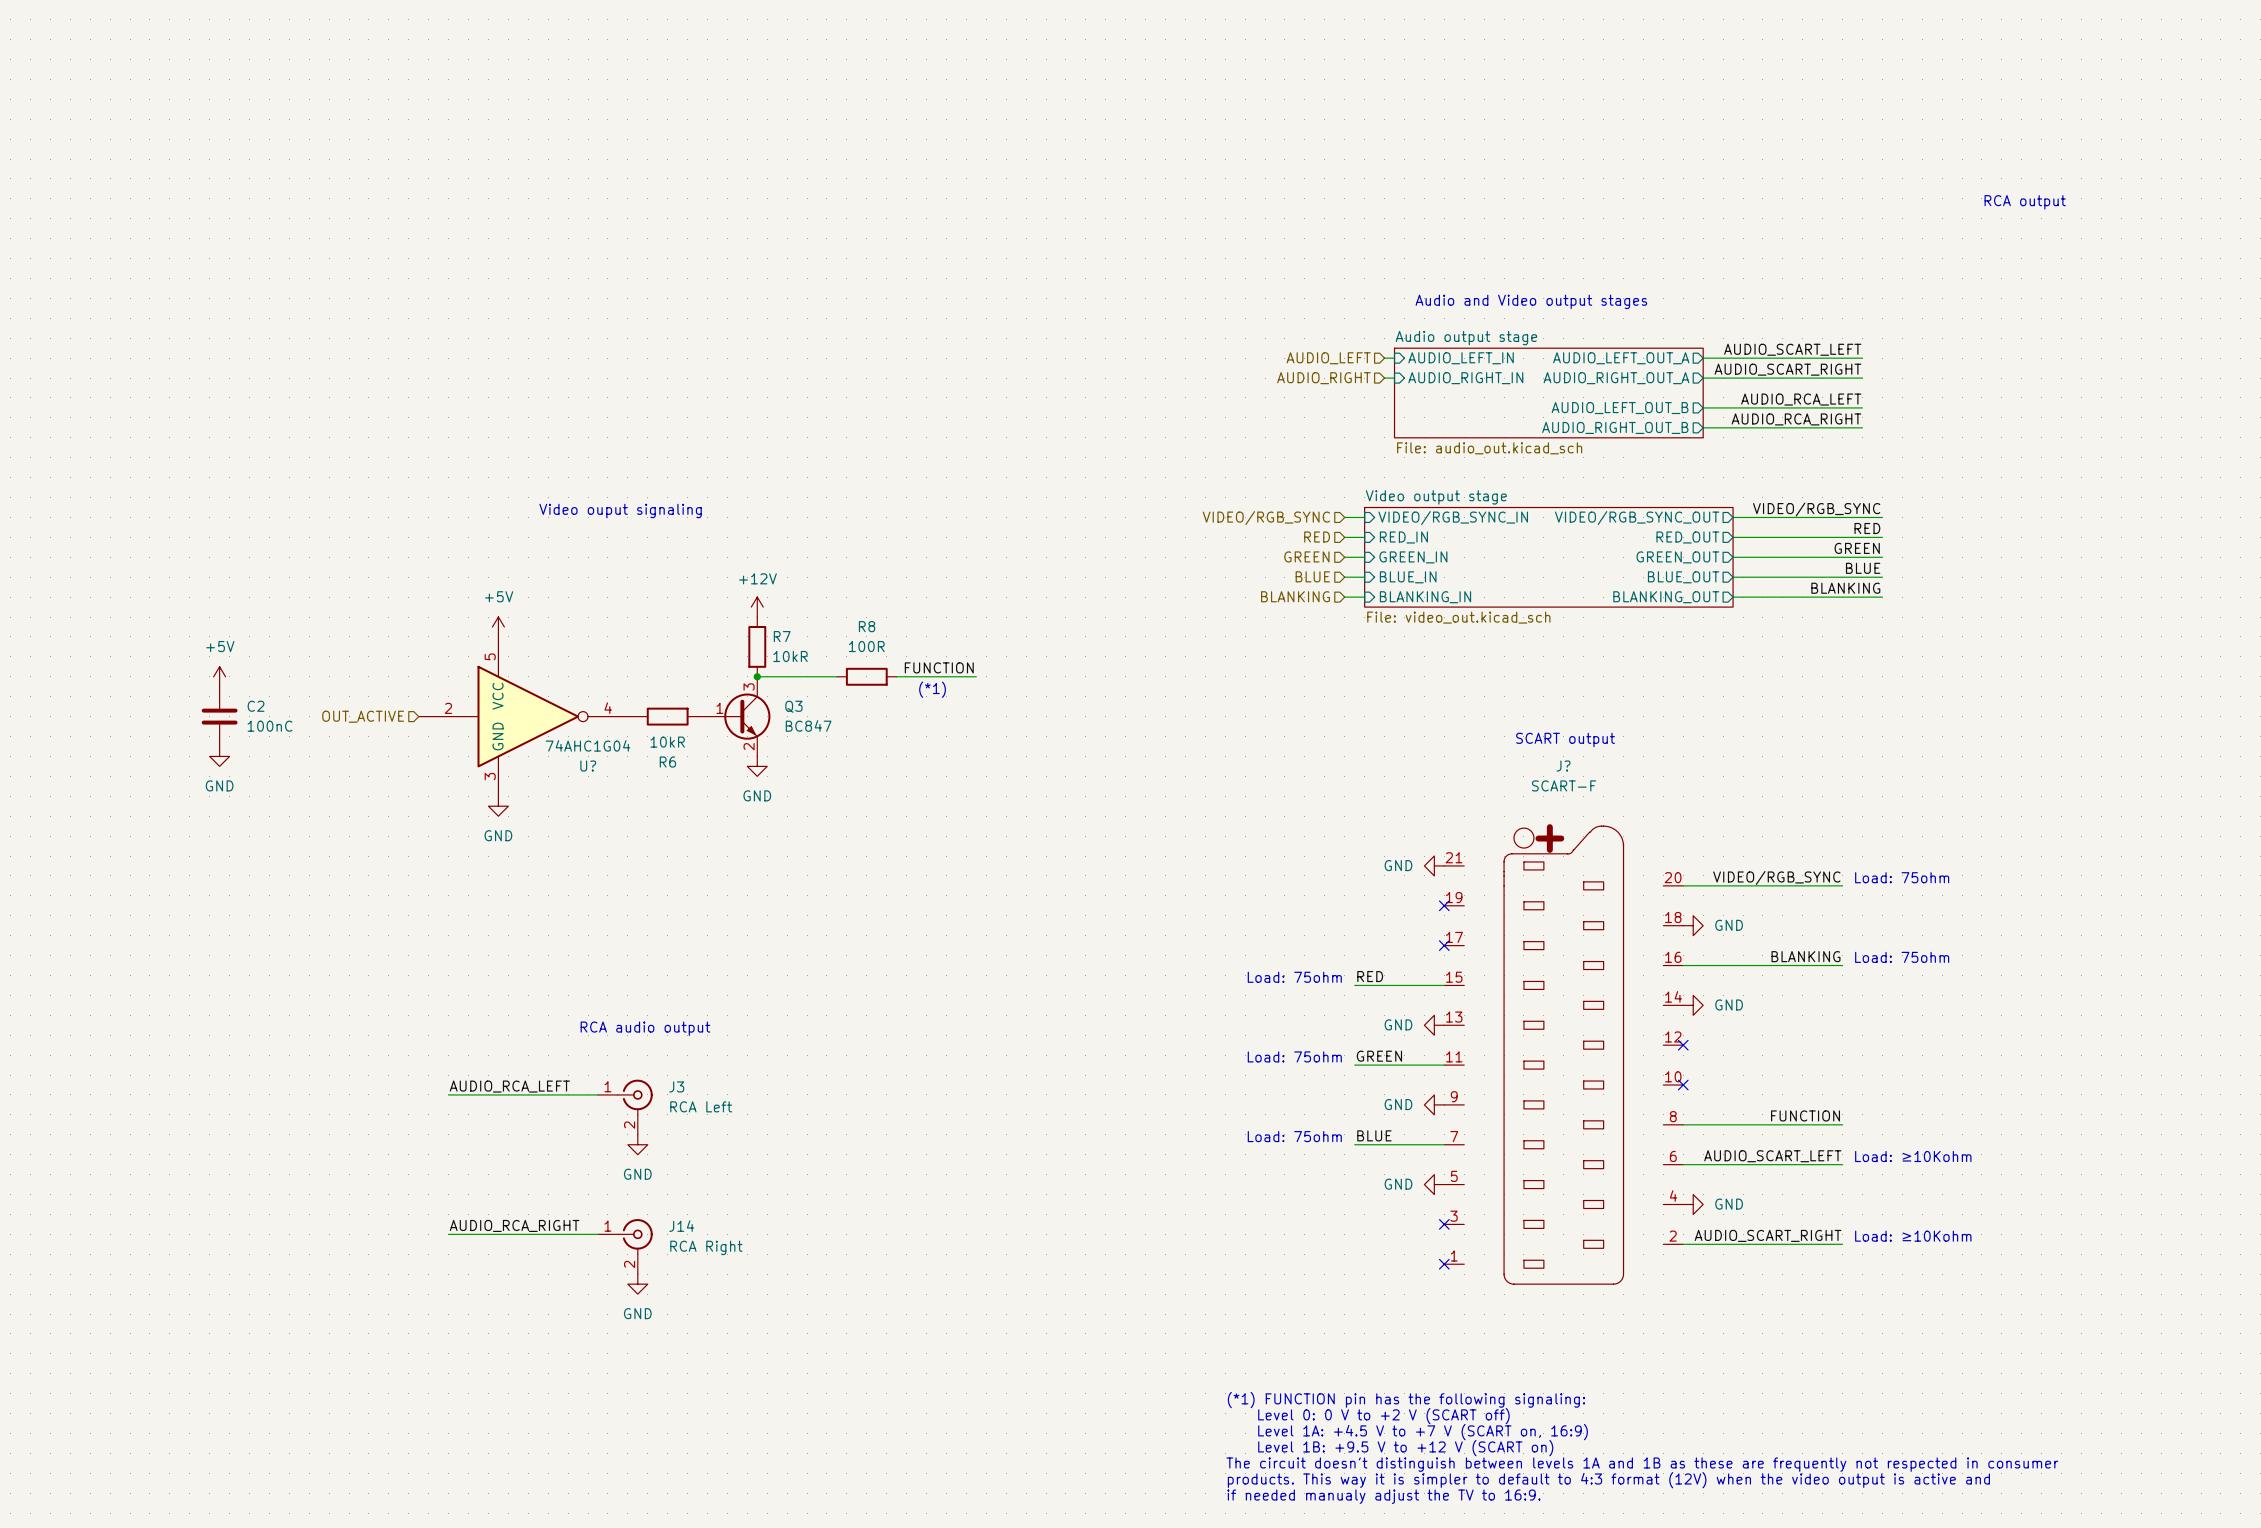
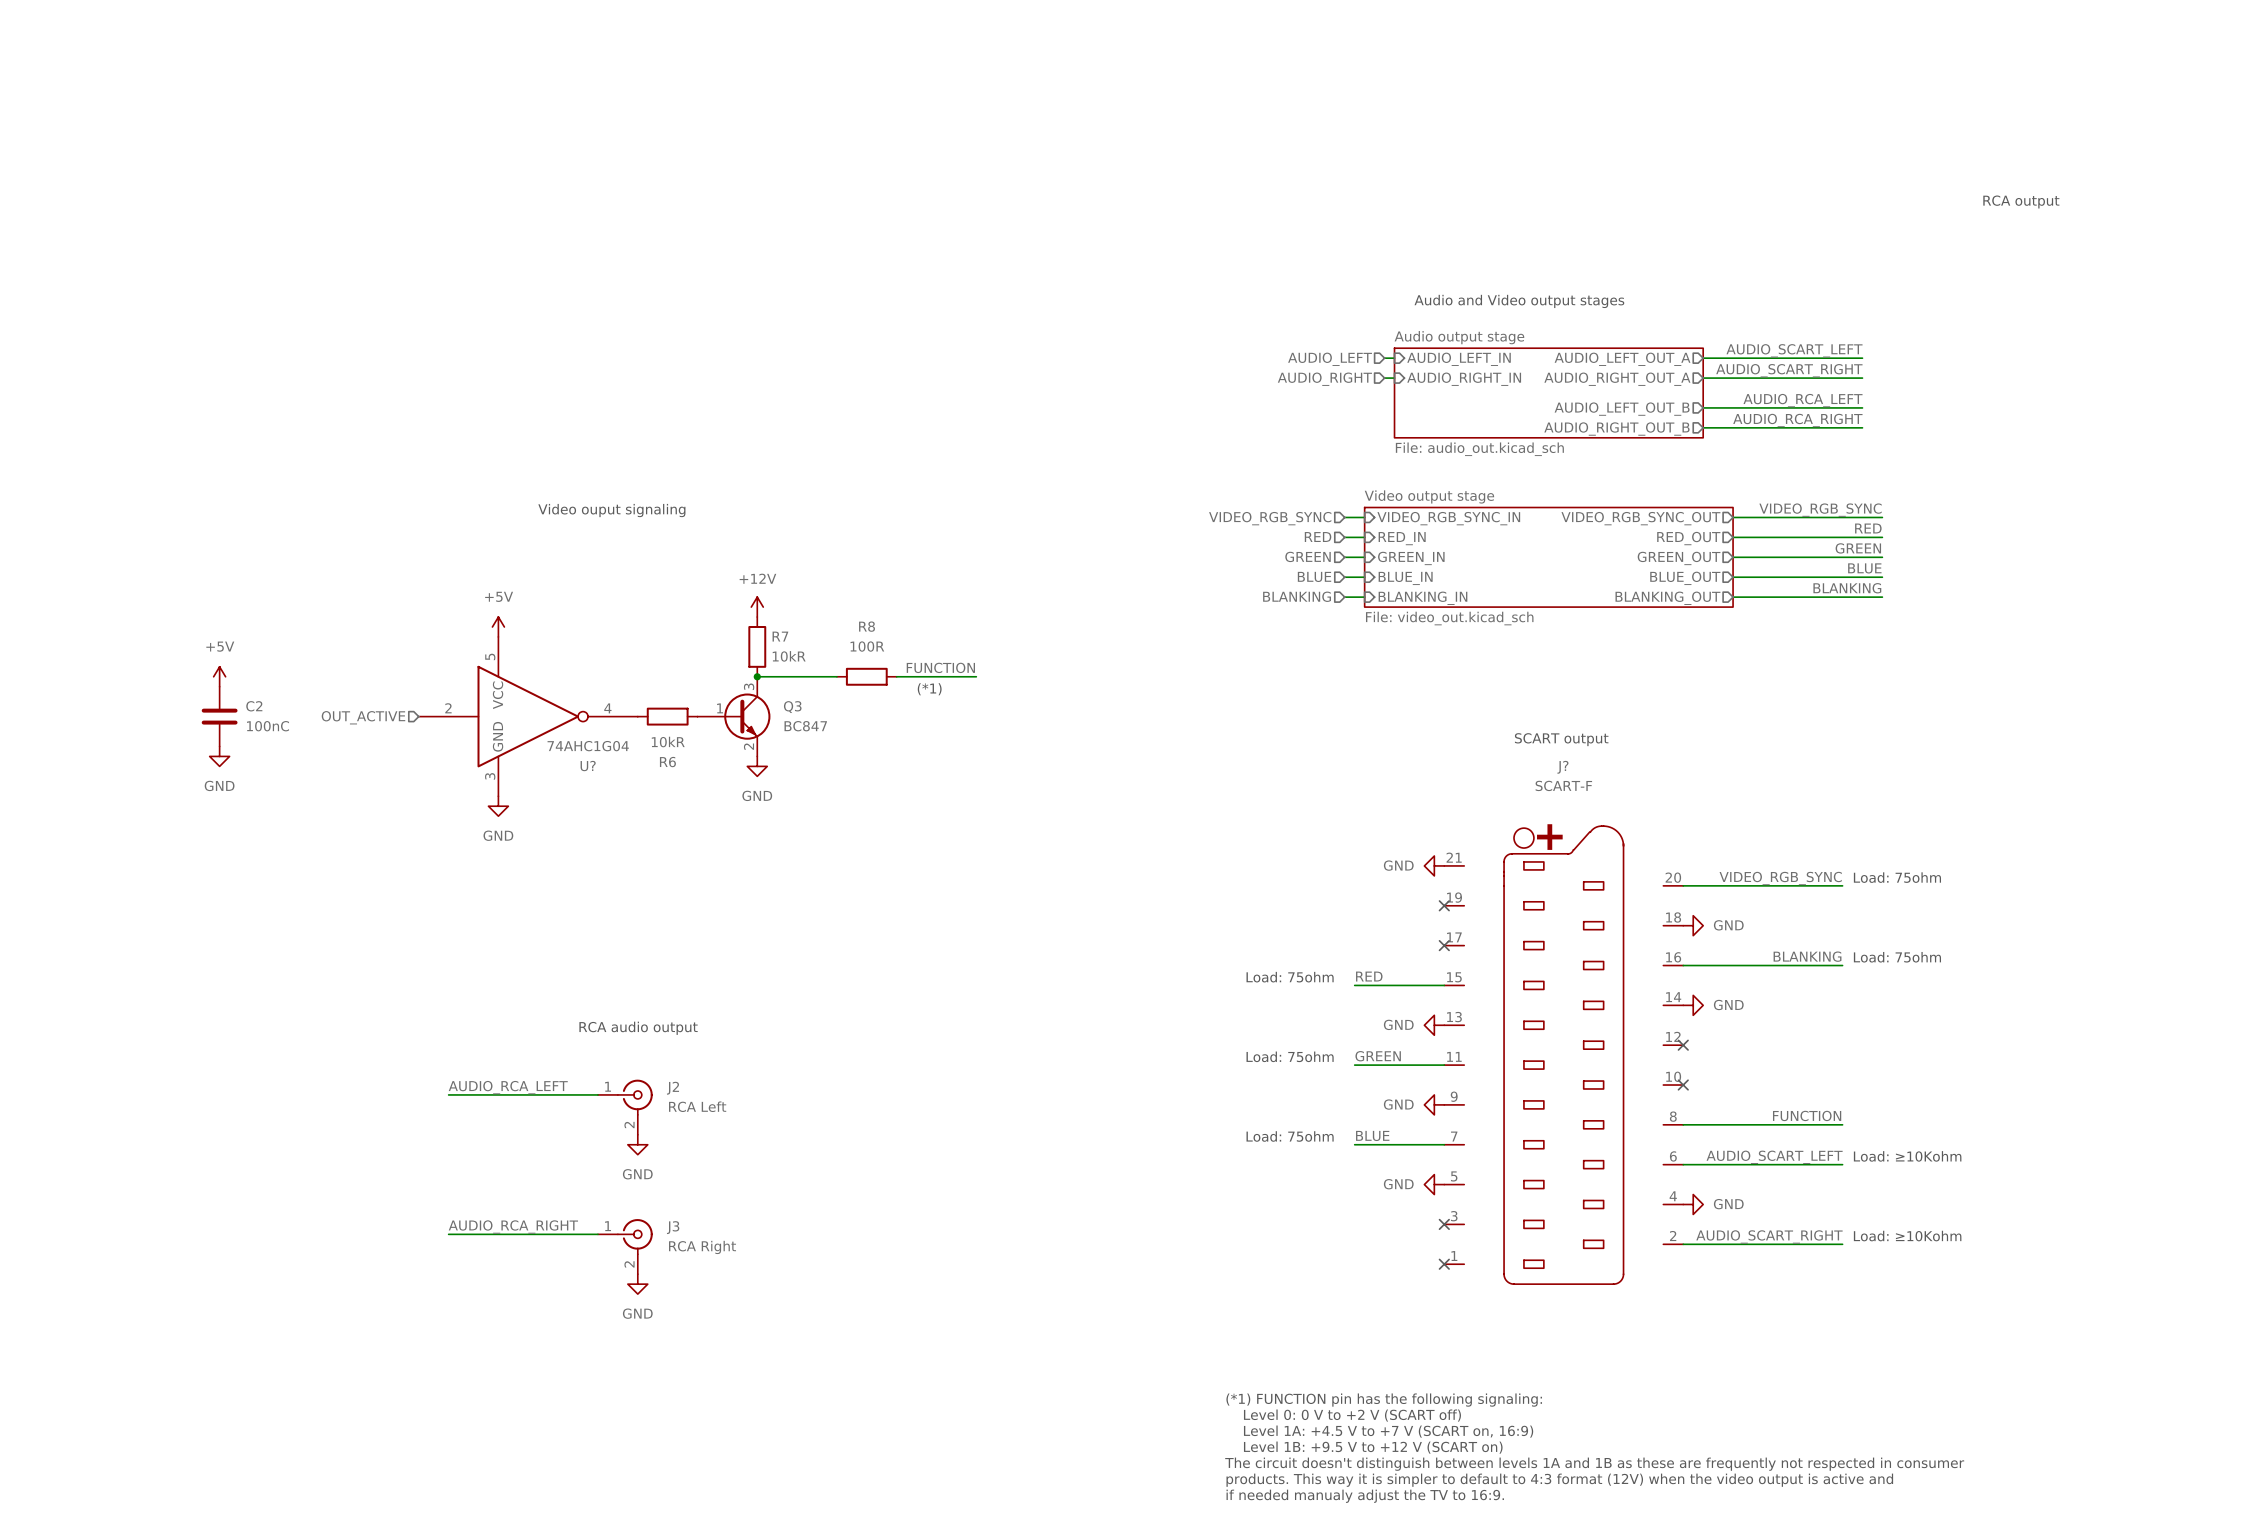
label: VIDEO/RGB_SYNC (1816, 509) -> VIDEO_RGB_SYNC (1820, 510)
hierarchical label: VIDEO/RGB_SYNC (1266, 518) -> VIDEO_RGB_SYNC (1270, 518)
sheet pin: VIDEO/RGB_SYNC_IN (1453, 518) -> VIDEO_RGB_SYNC_IN (1448, 518)
sheet pin: VIDEO/RGB_SYNC_OUT (1637, 518) -> VIDEO_RGB_SYNC_OUT (1640, 518)
label: VIDEO/RGB_SYNC (1776, 877) -> VIDEO_RGB_SYNC (1780, 878)
J3 name: J3 (676, 1086) -> J2 (673, 1088)
J14 name: J14 (681, 1226) -> J3 (673, 1227)

